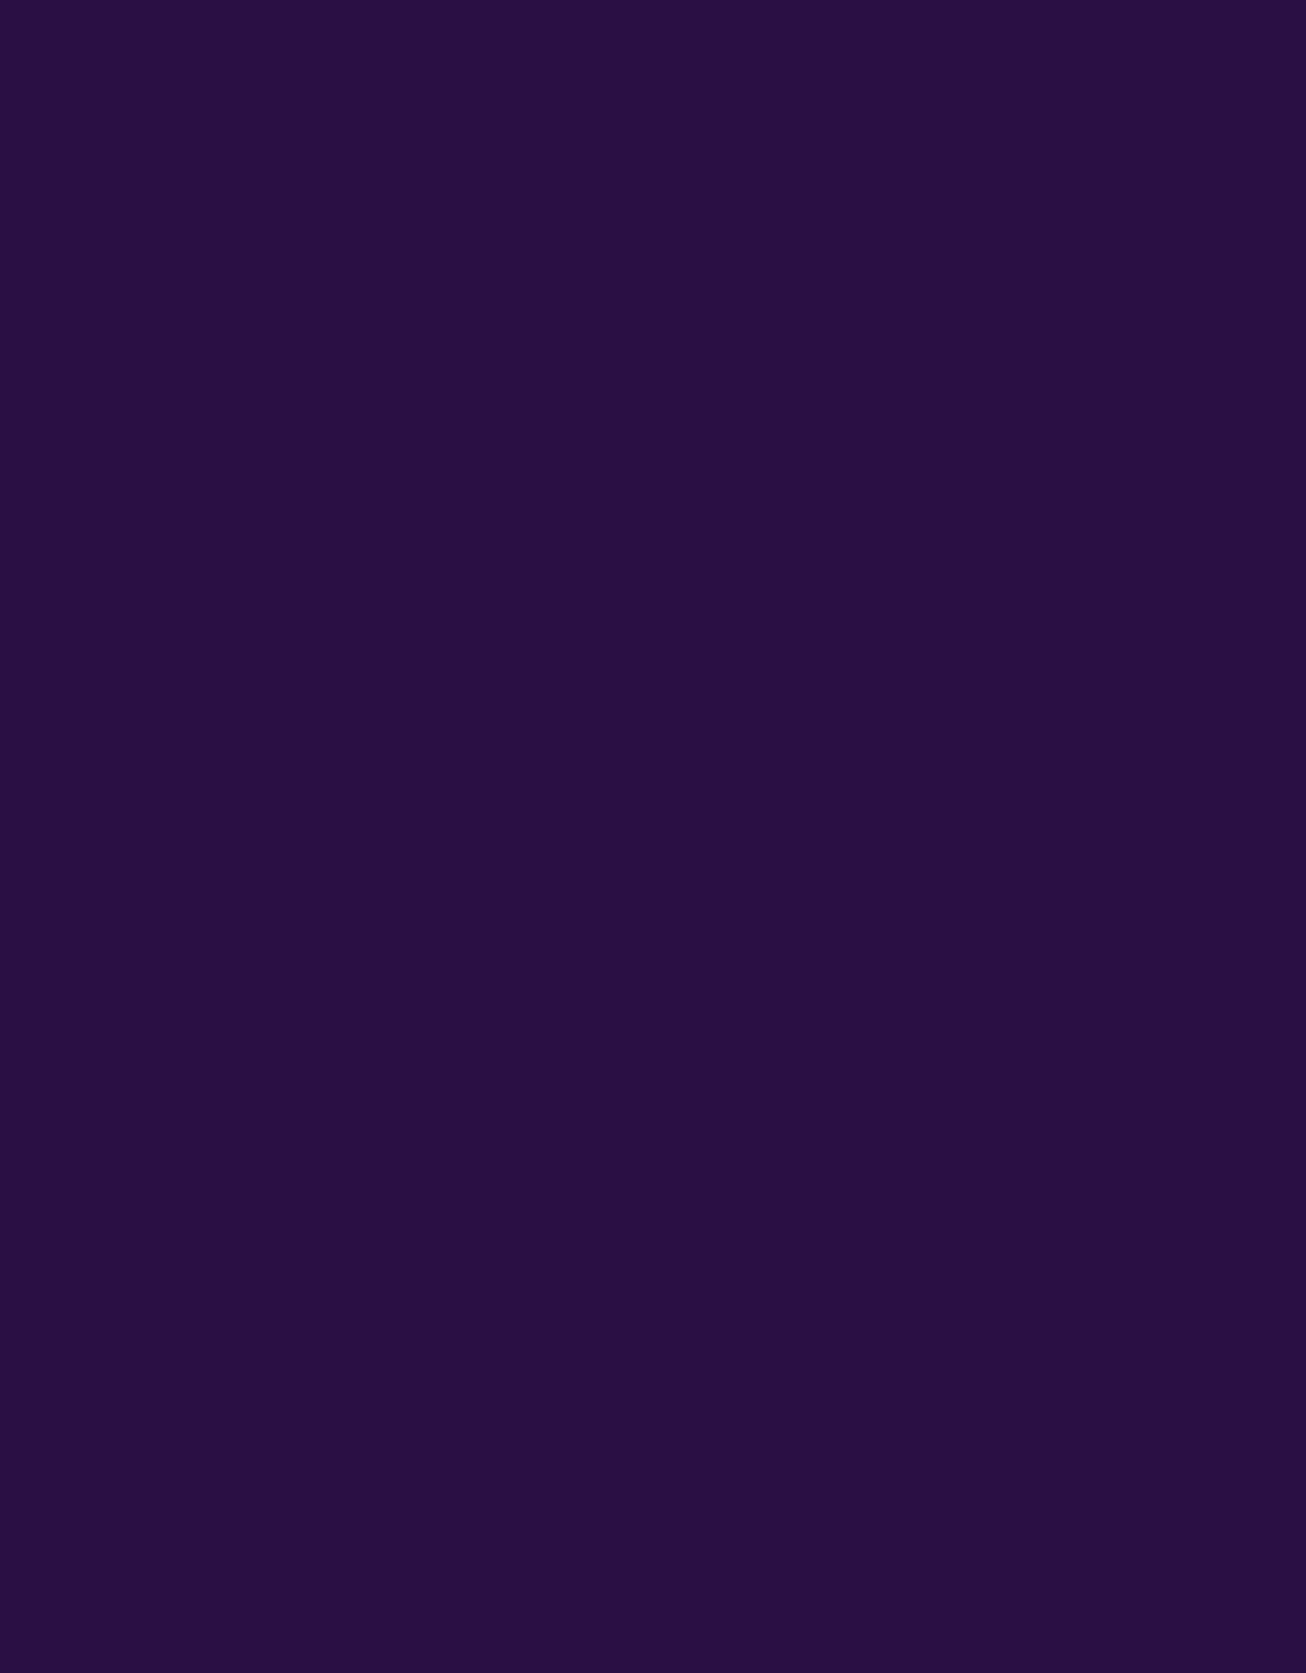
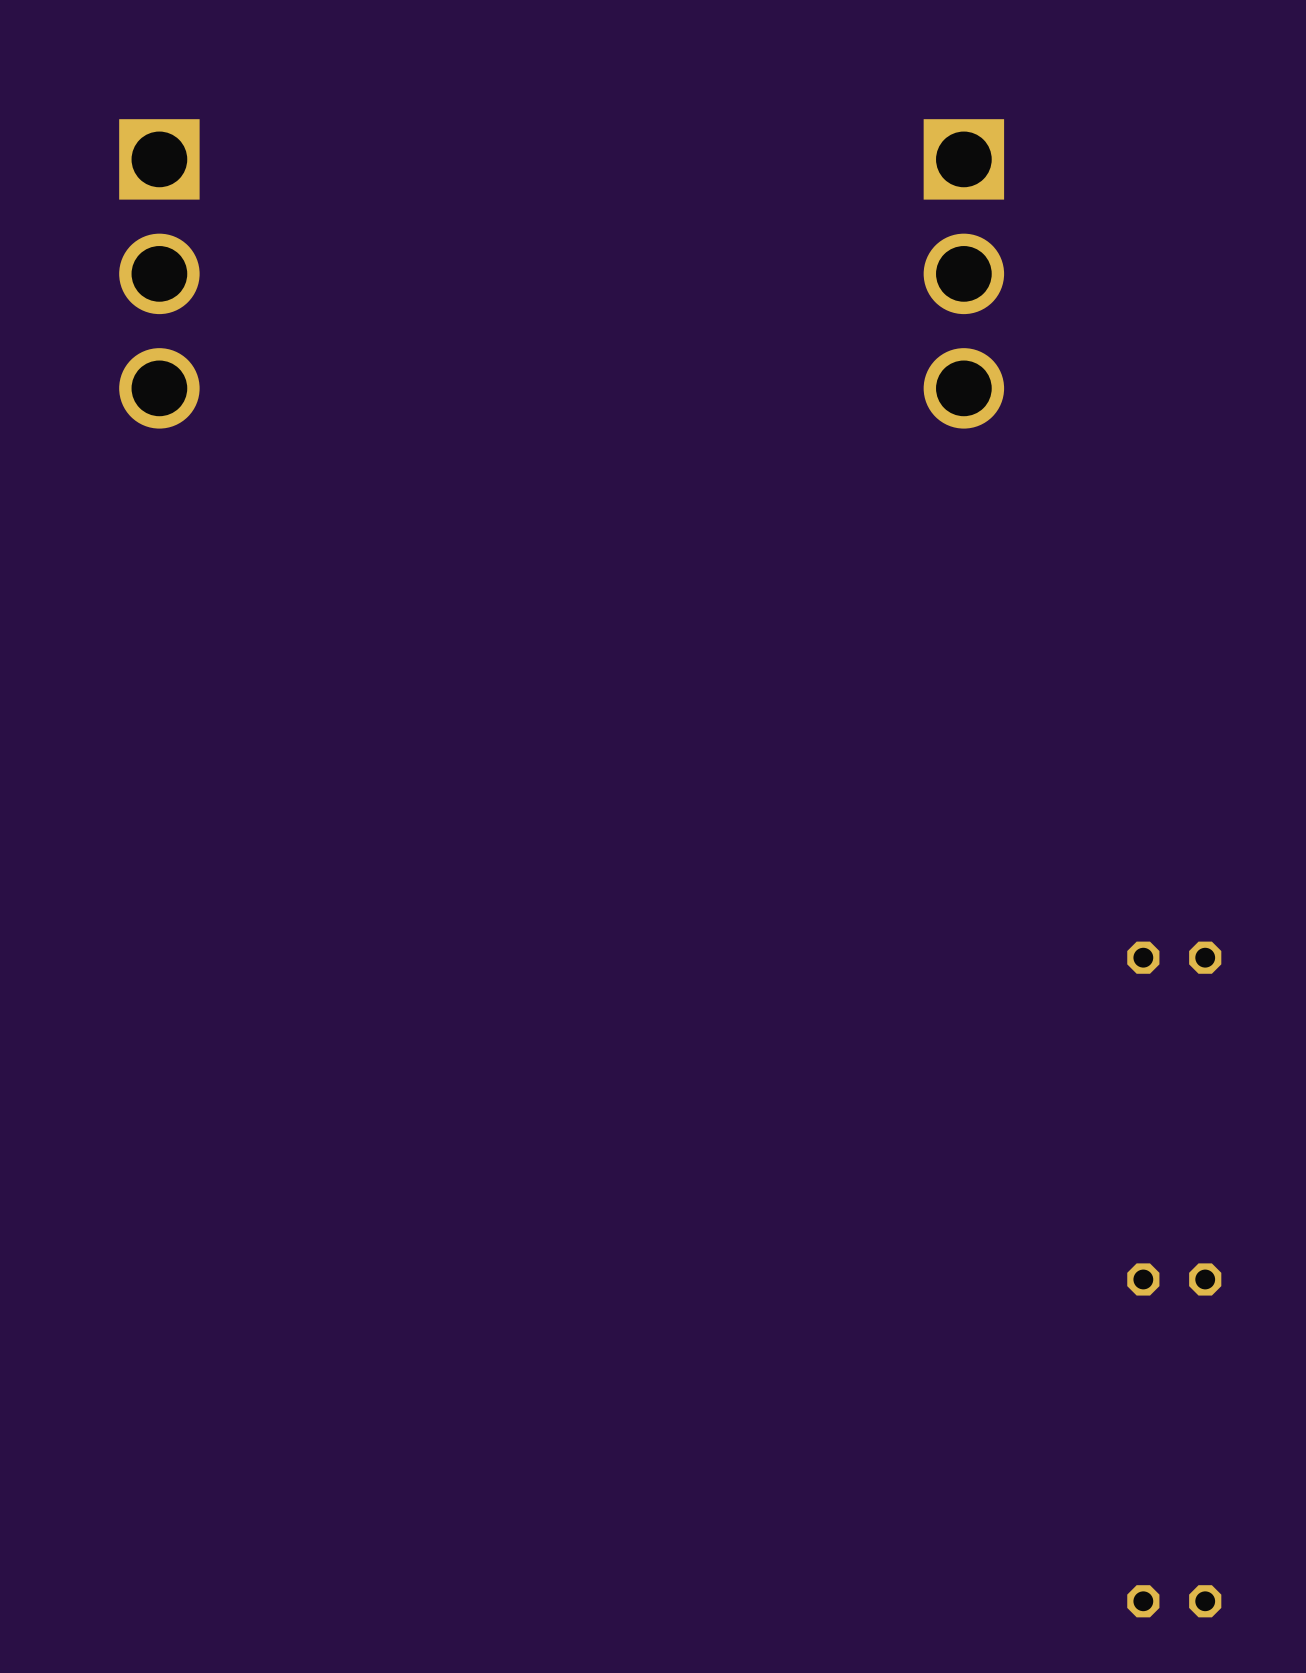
part: none -> (159, 273)
part: none -> (963, 273)
part: none -> (1174, 957)
part: none -> (1174, 1279)
part: none -> (1174, 1601)

